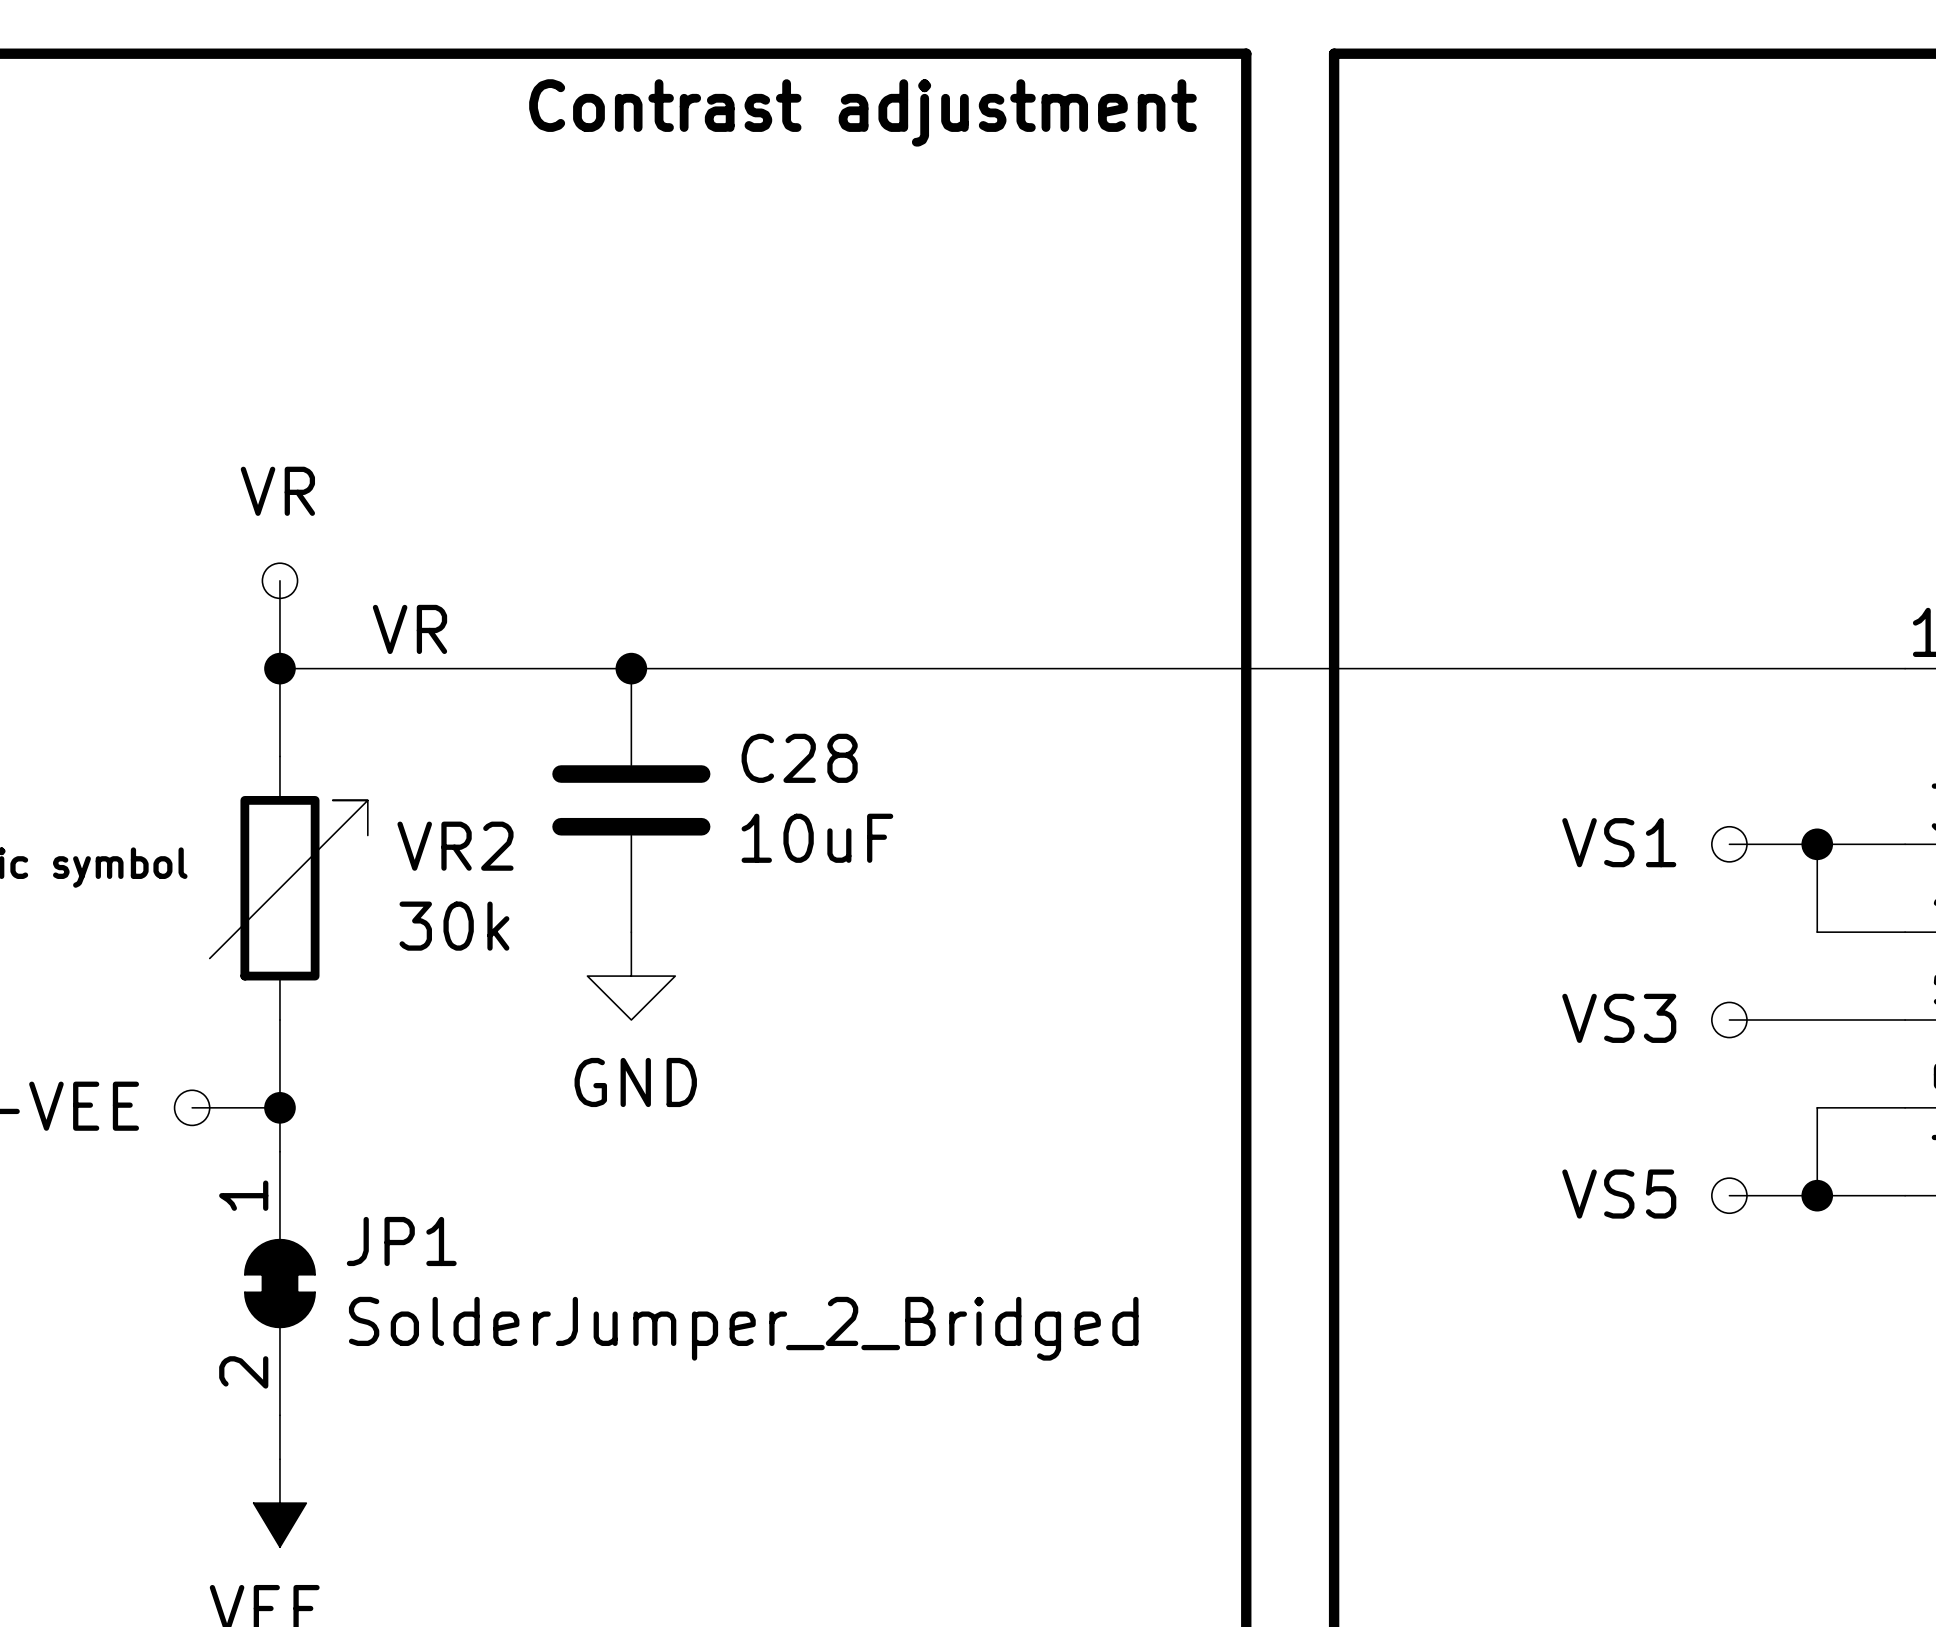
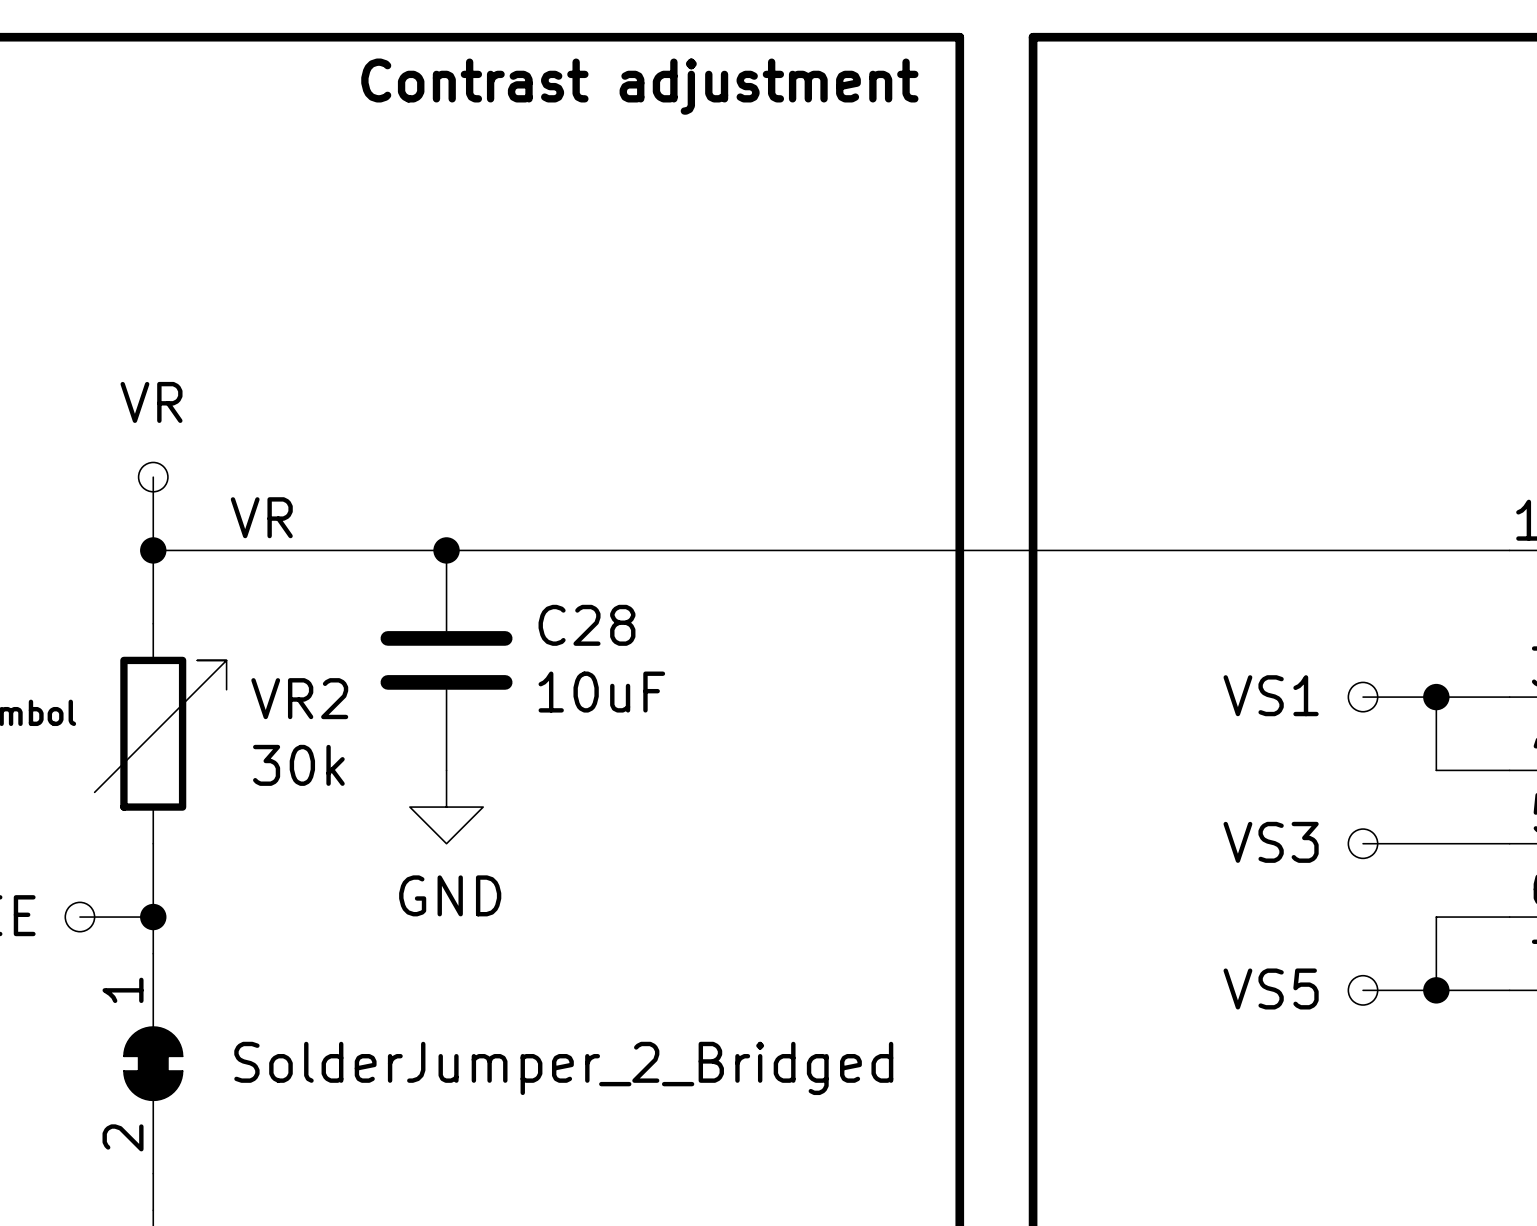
JP1 name: JP1 (401, 1241) -> none
JP1 value position: SolderJumper_2_Bridged (743, 1328) -> SolderJumper_2_Bridged (563, 1068)

